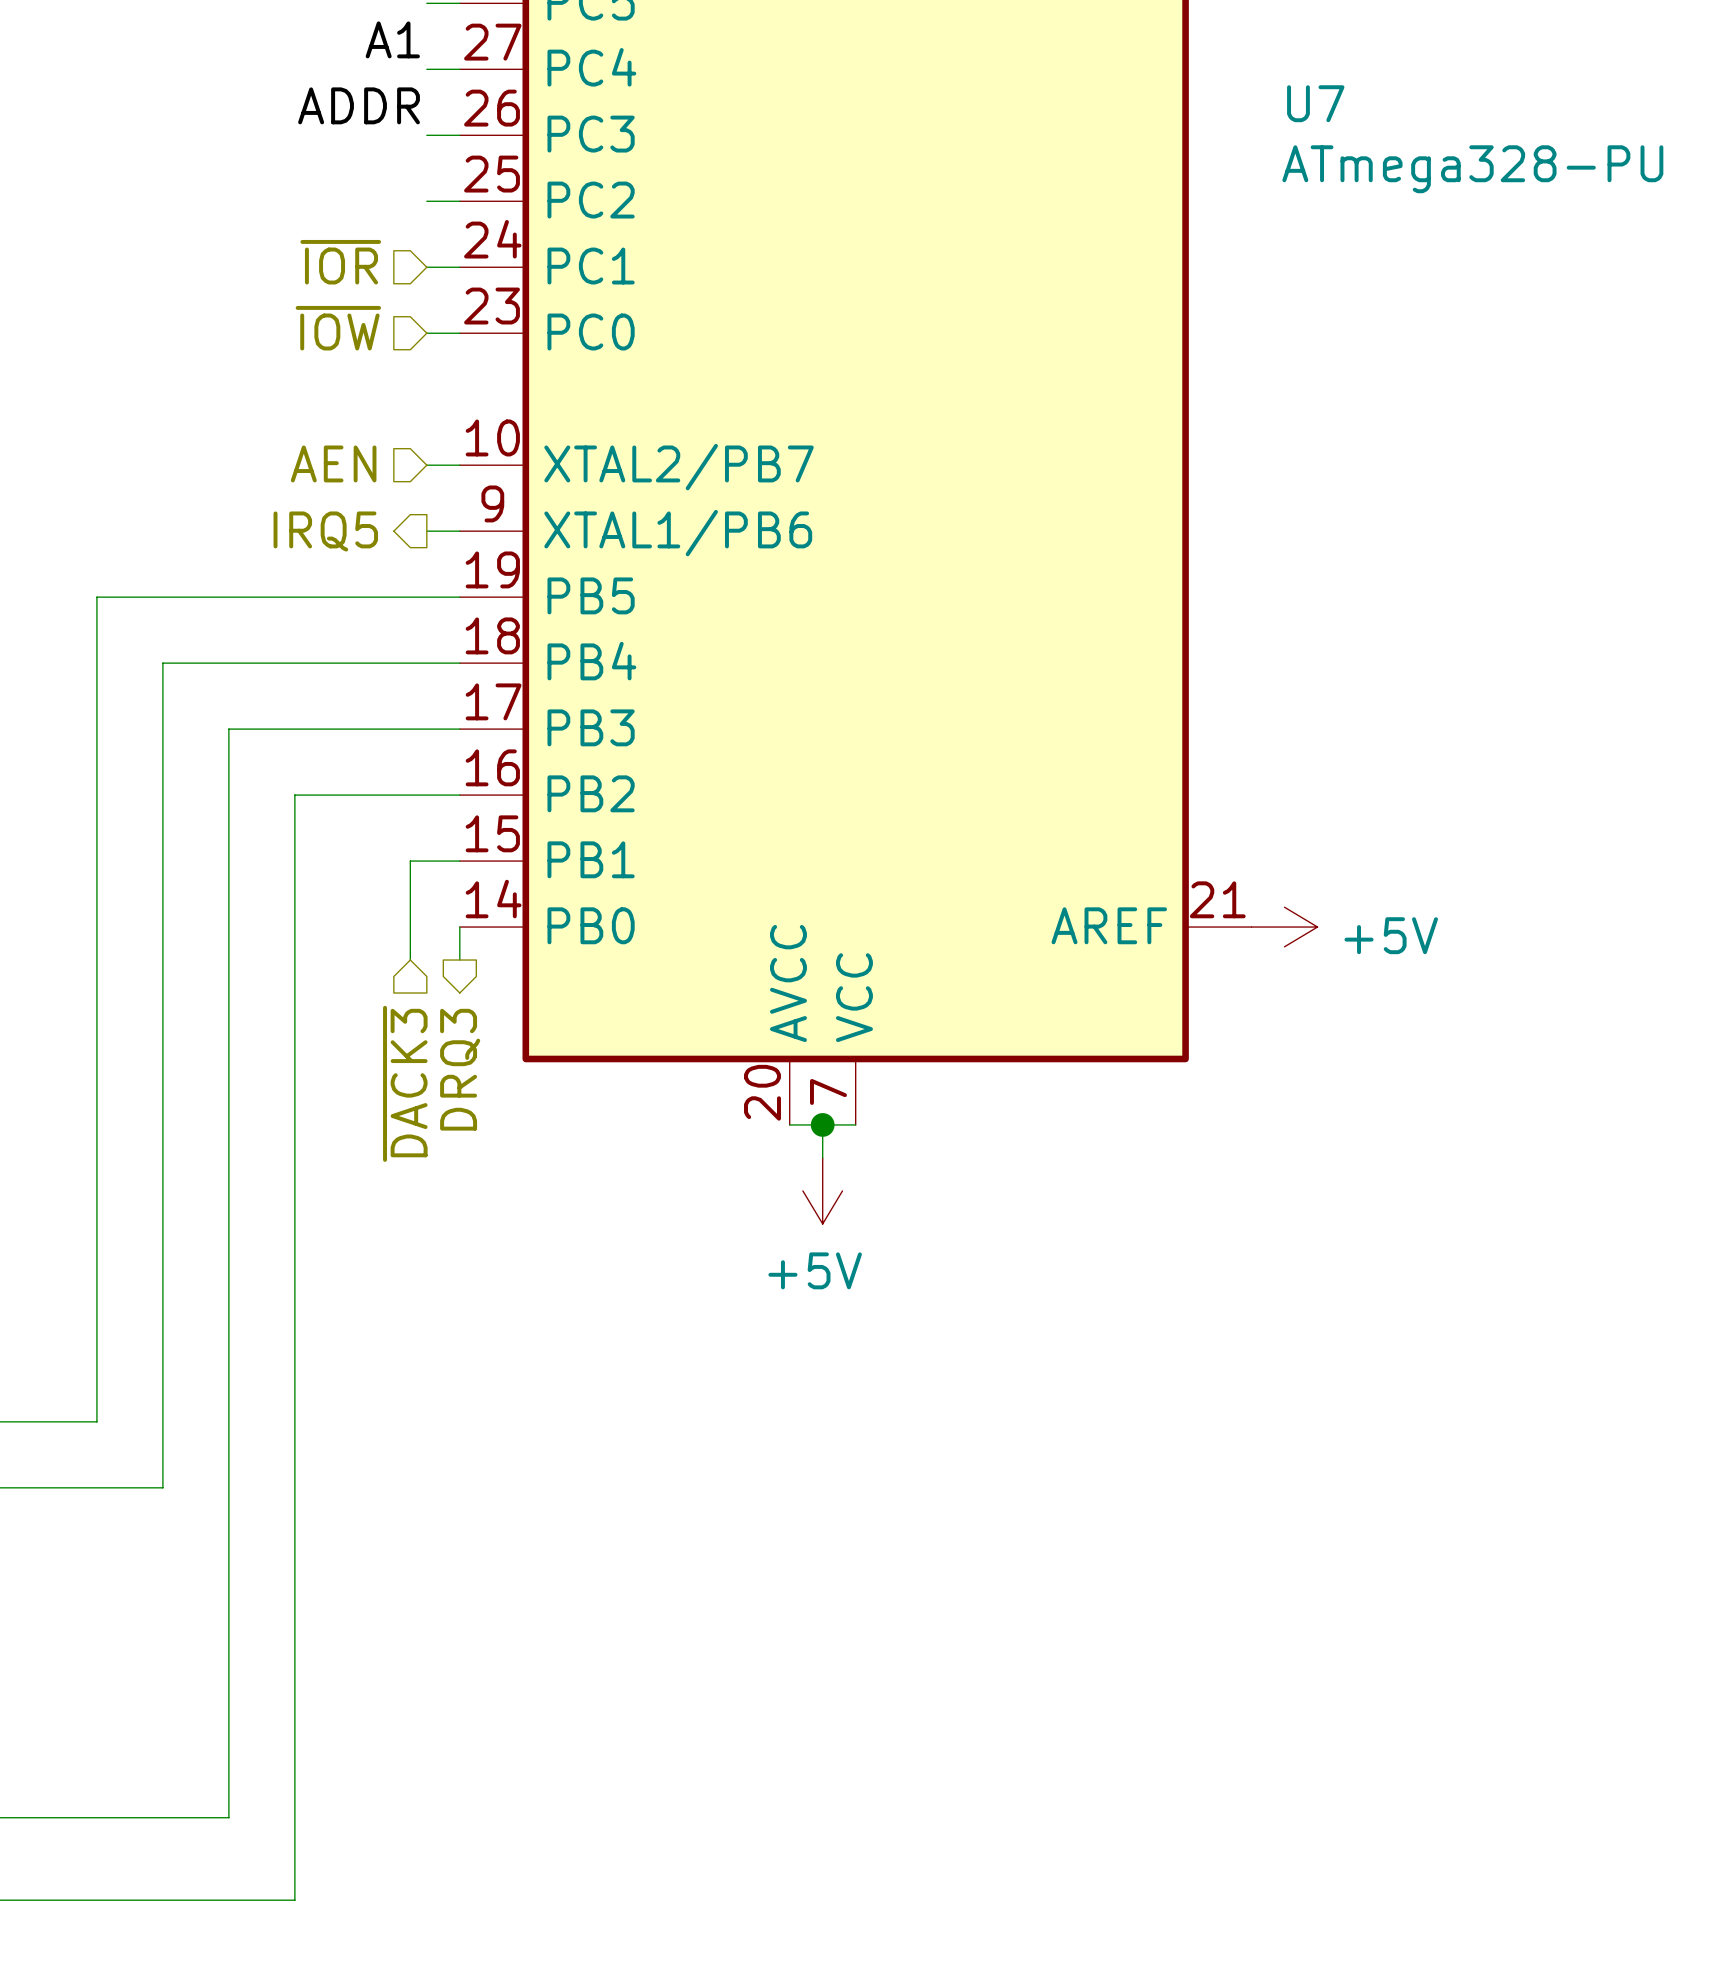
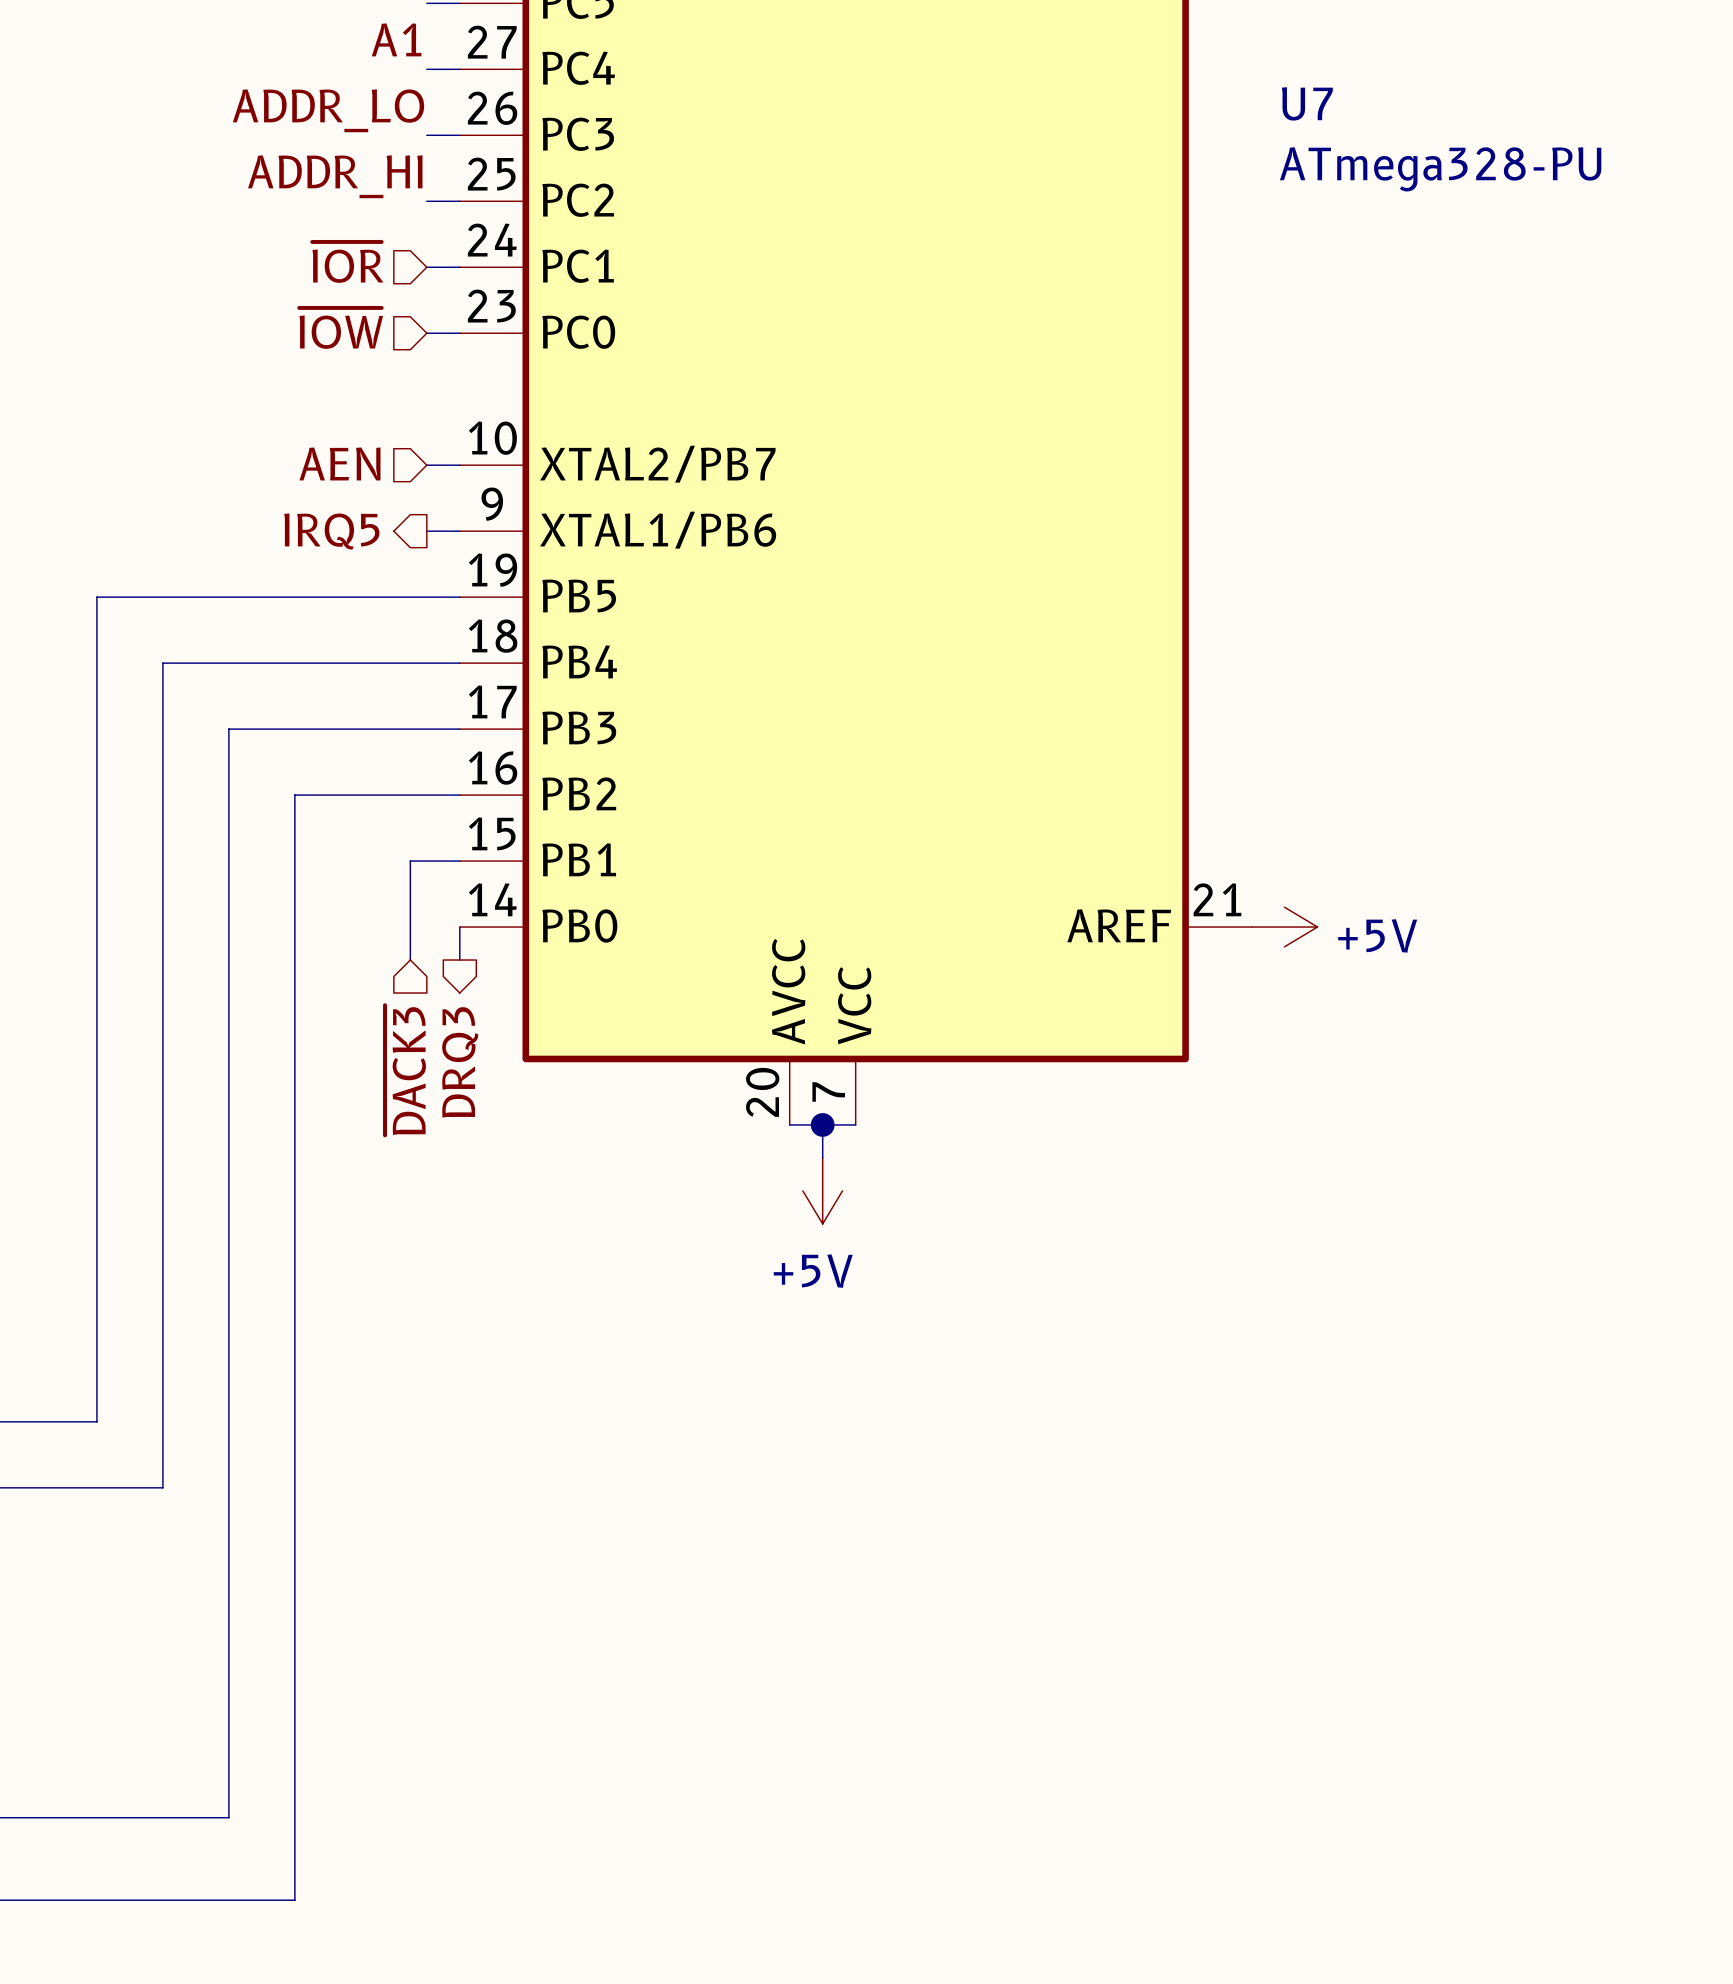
label: ADDR (359, 105) -> ADDR_LO (328, 110)
label: none -> ADDR_HI (335, 176)

